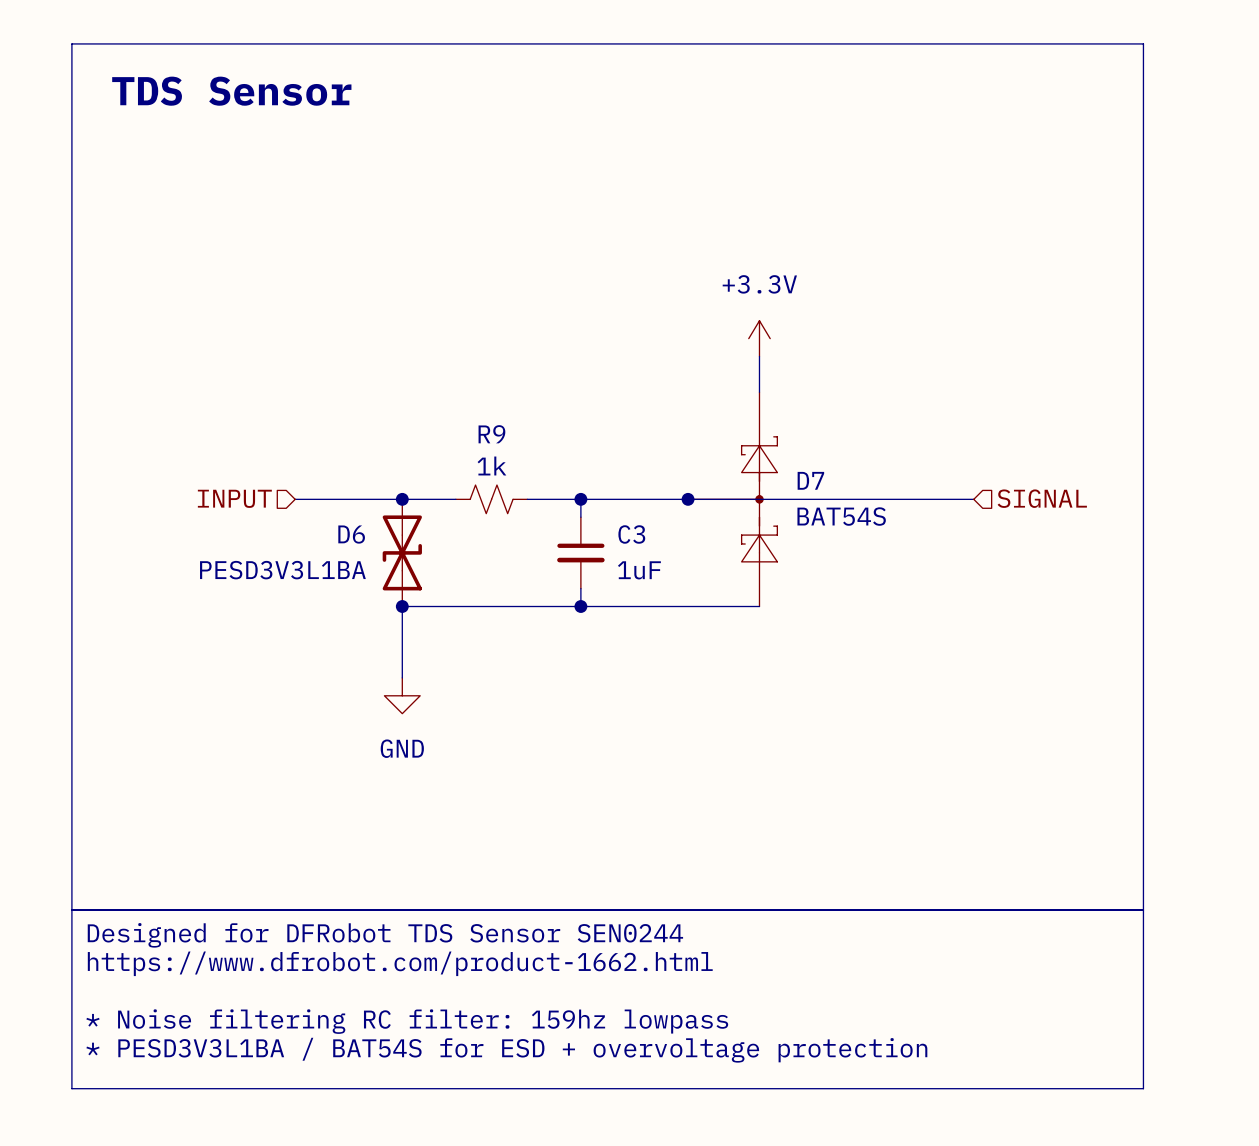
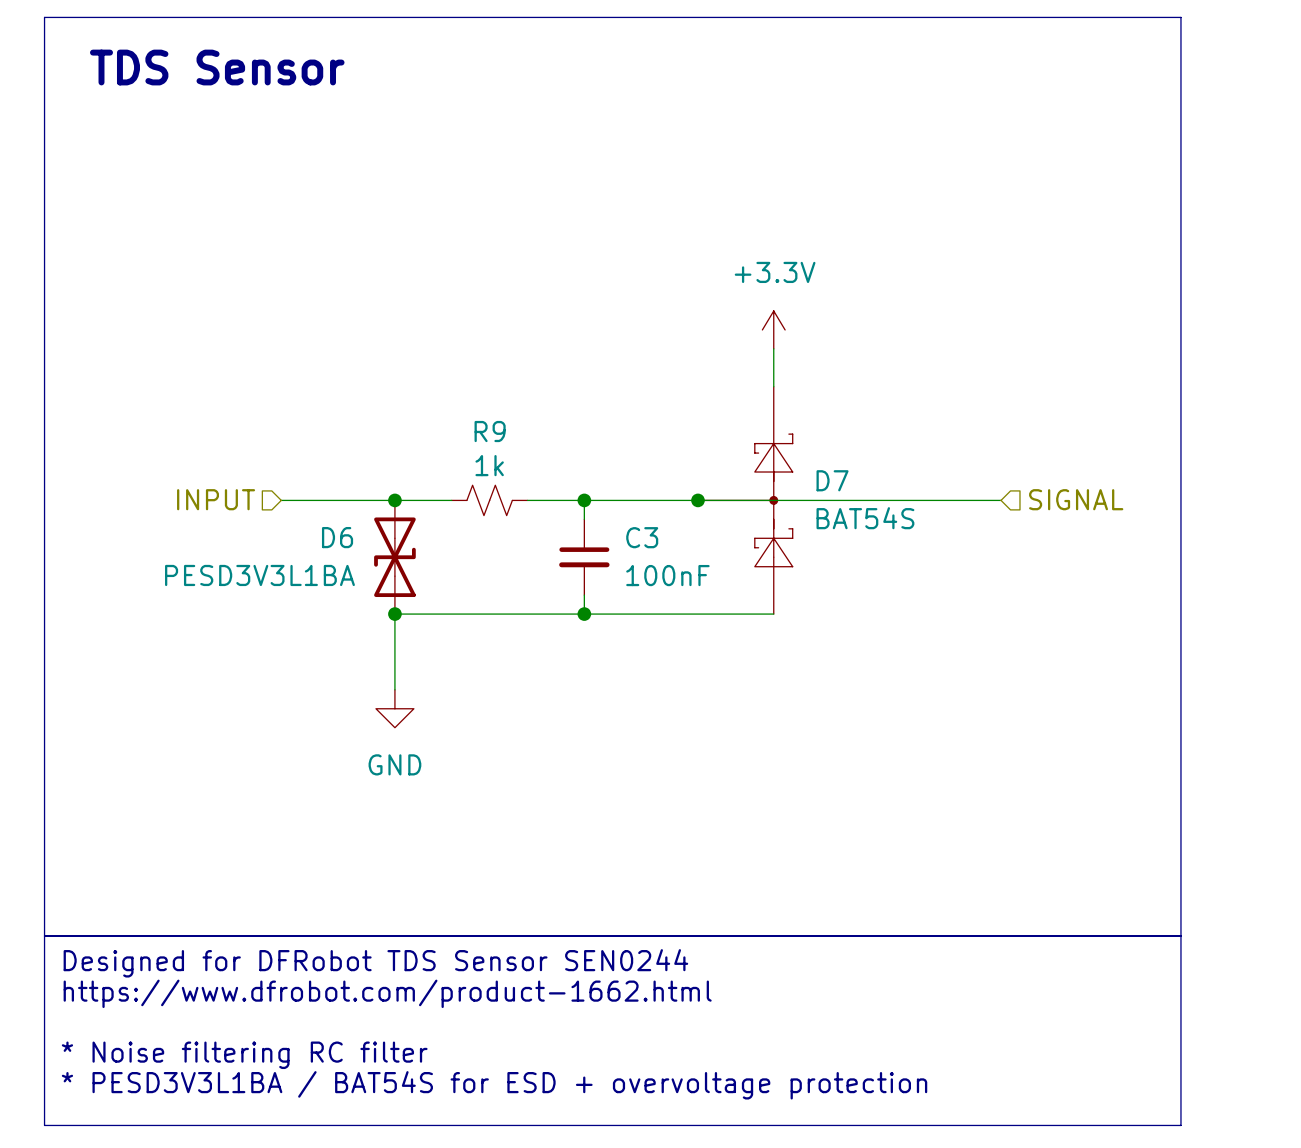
C3 value: 1uF (639, 570) -> 100nF (667, 575)
text: * Noise filtering RC filter: 159hz lowpass (407, 1021) -> * Noise filtering RC filter (244, 1055)

